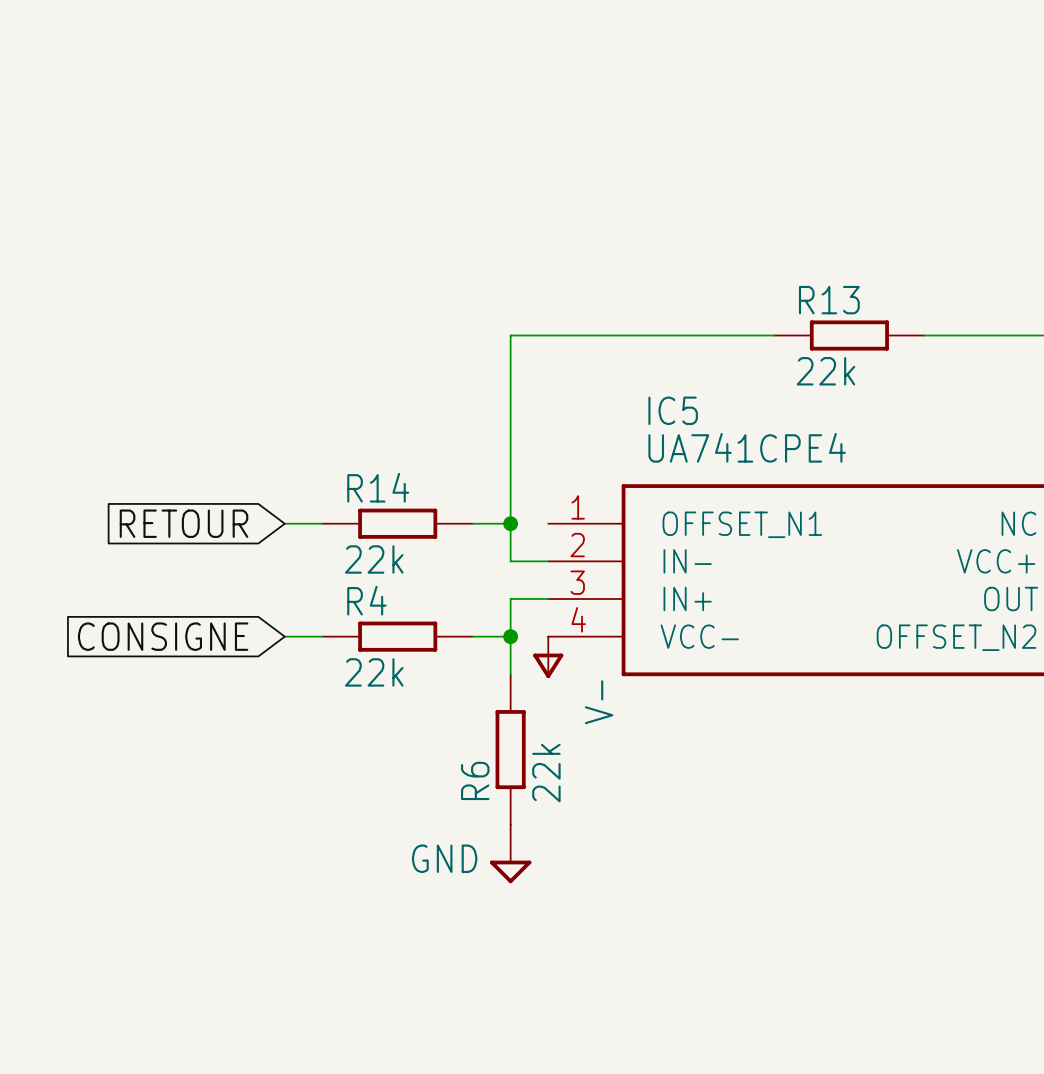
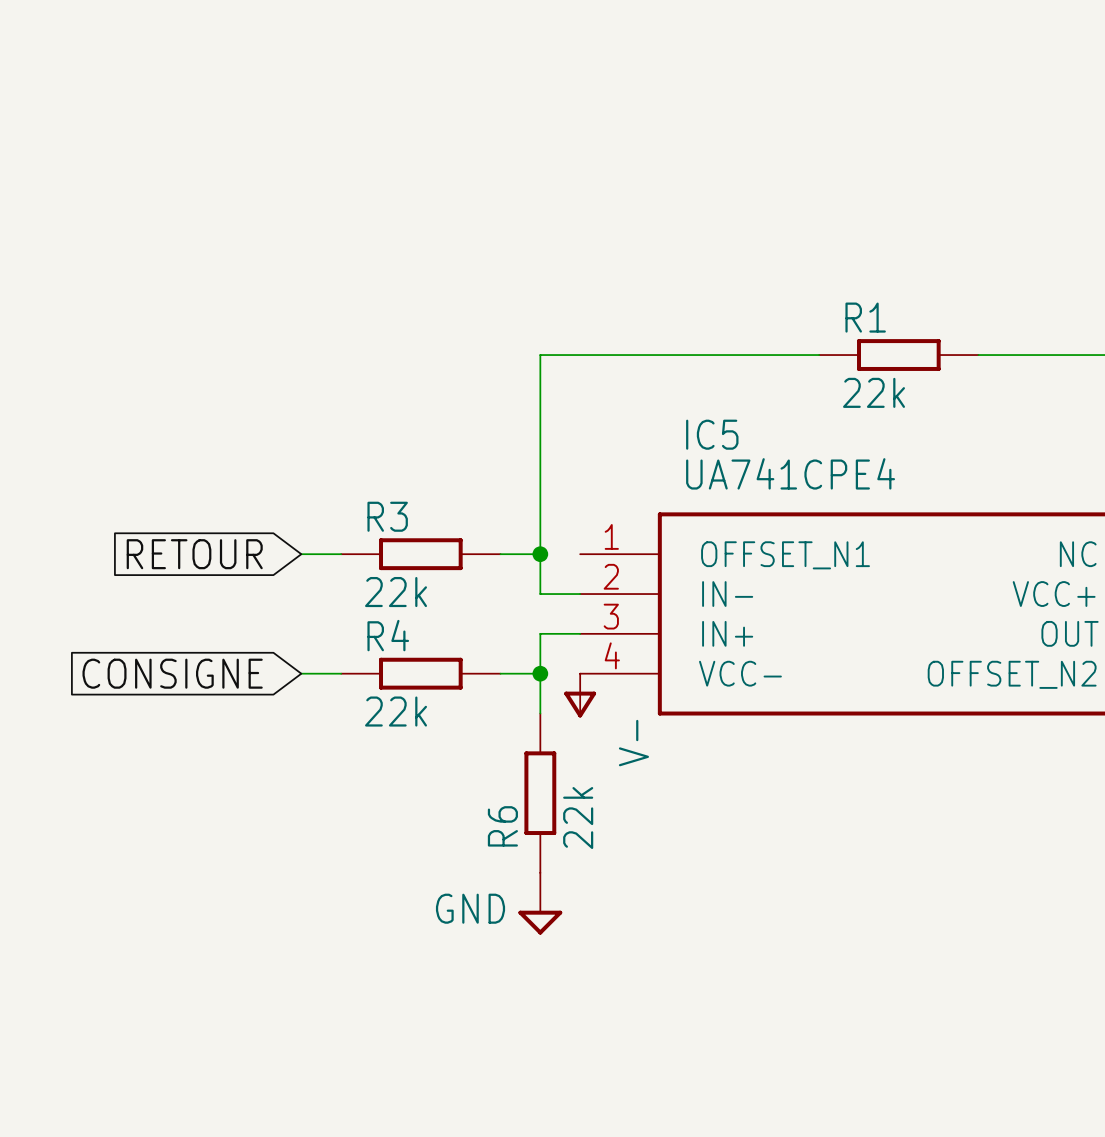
R13 name: R13 (829, 300) -> R1 (865, 317)
R14 name: R14 (378, 487) -> R3 (387, 516)

